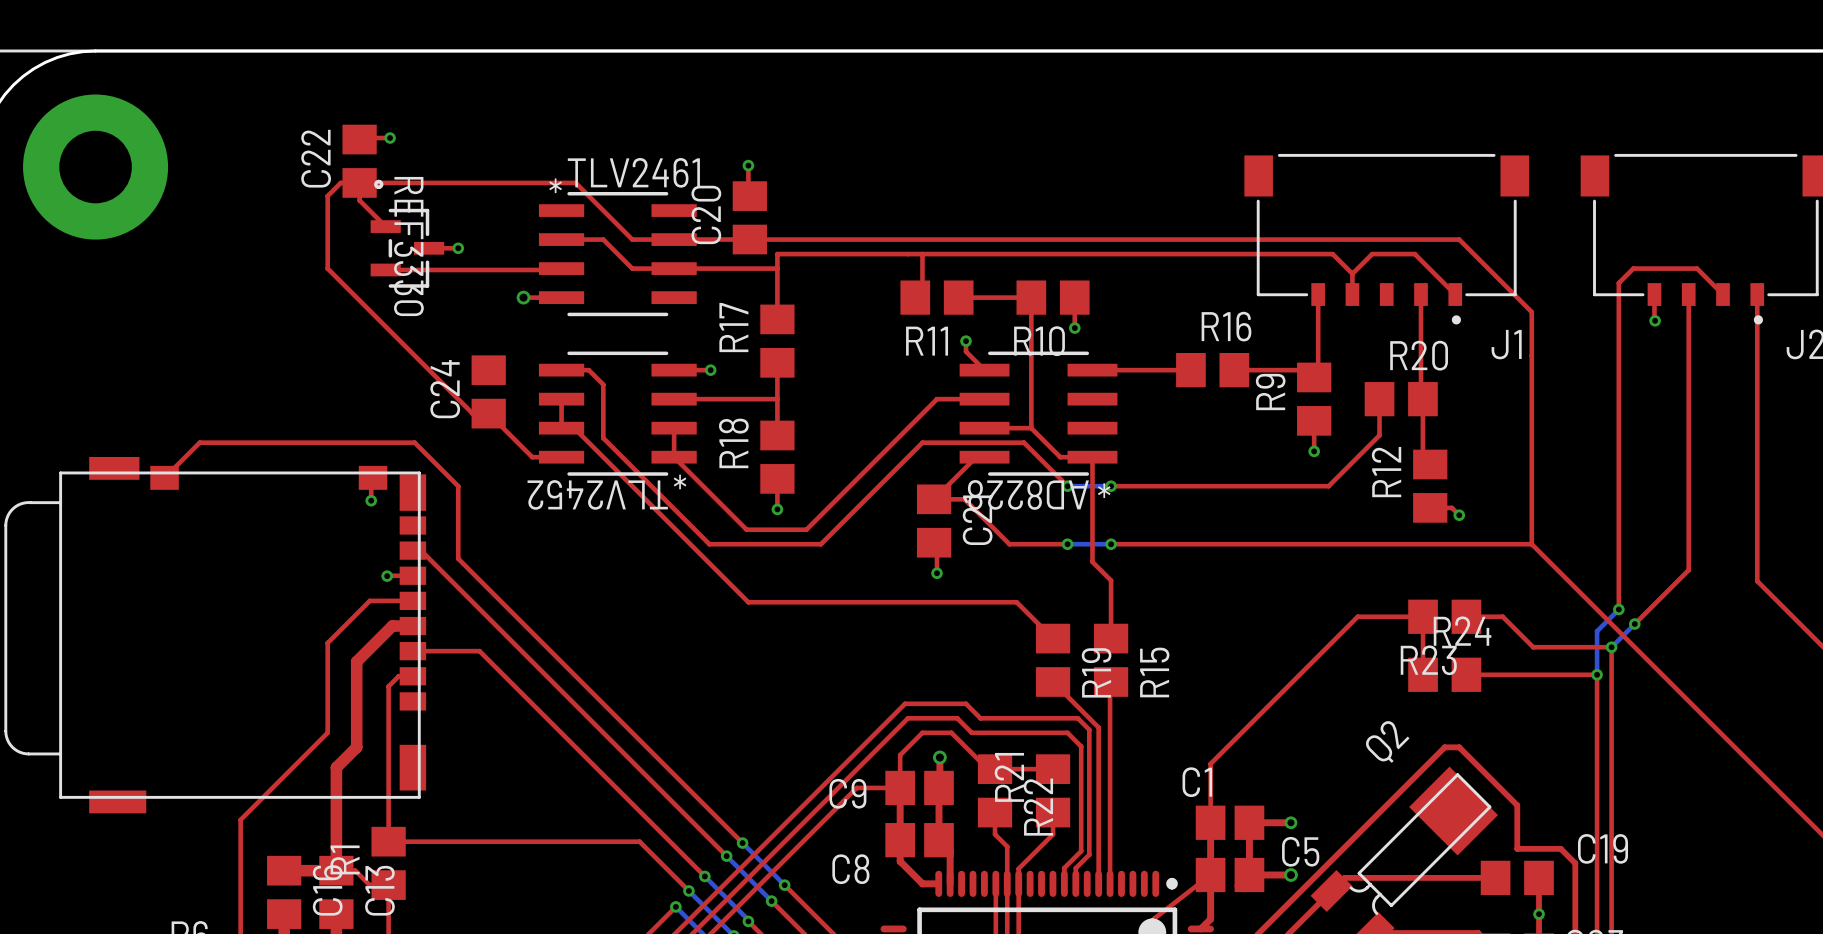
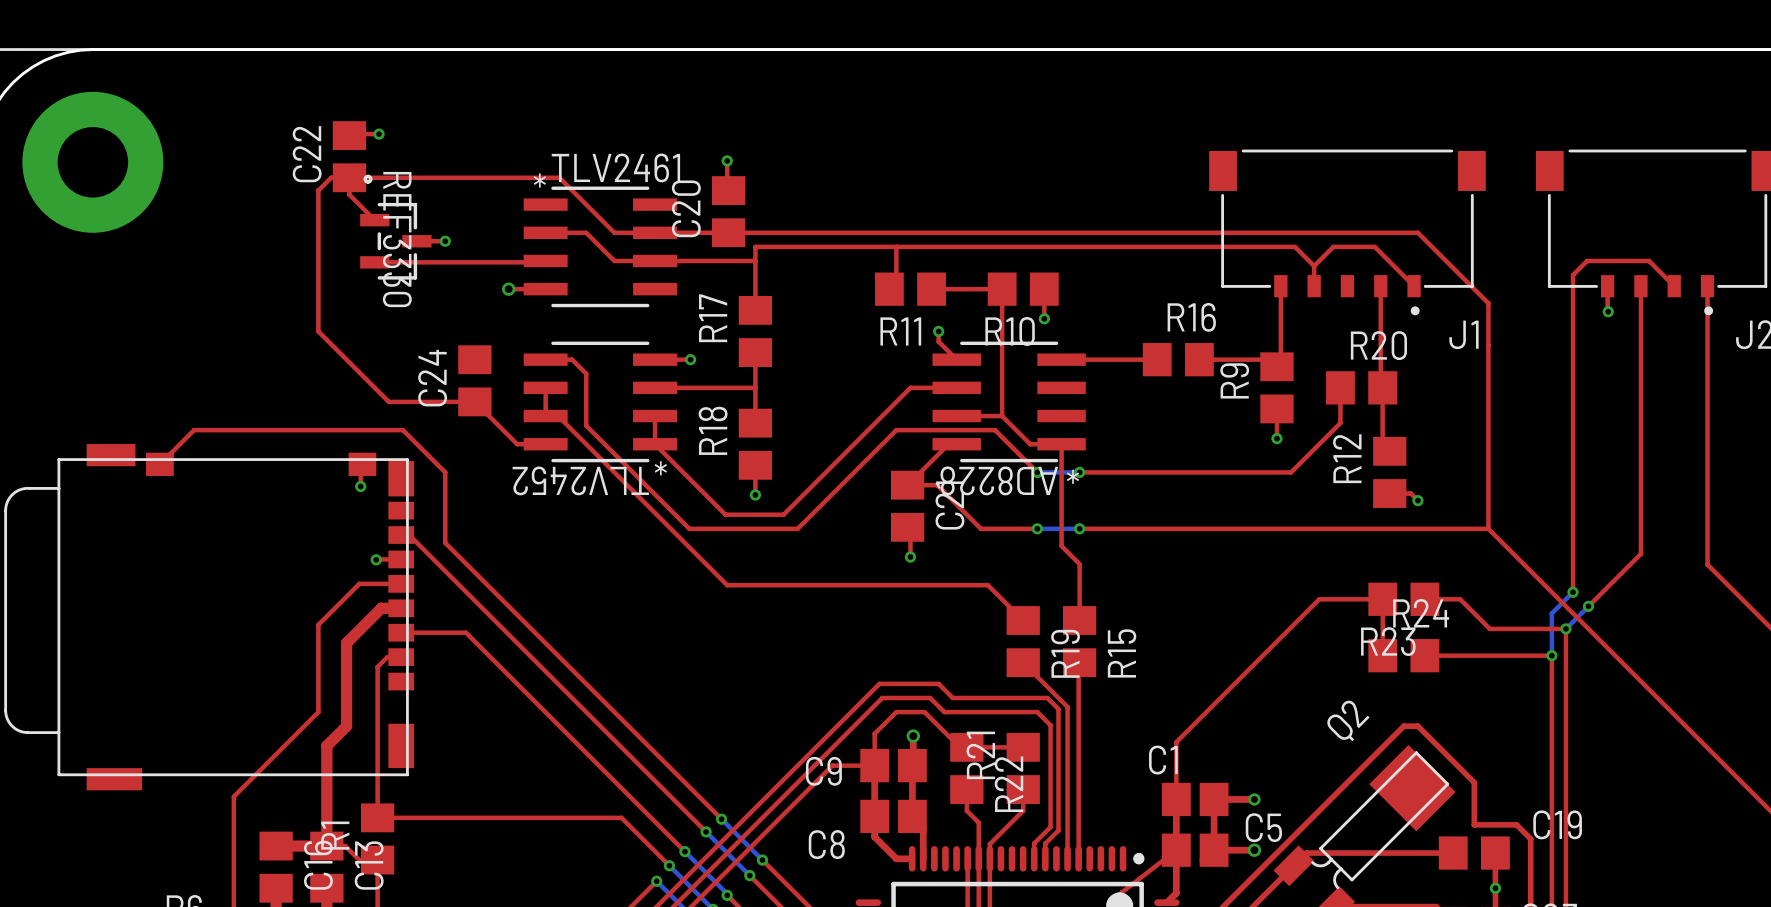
top track: (327, 268) (472, 413) -> (318, 260) (318, 331) (388, 401) (459, 401)

